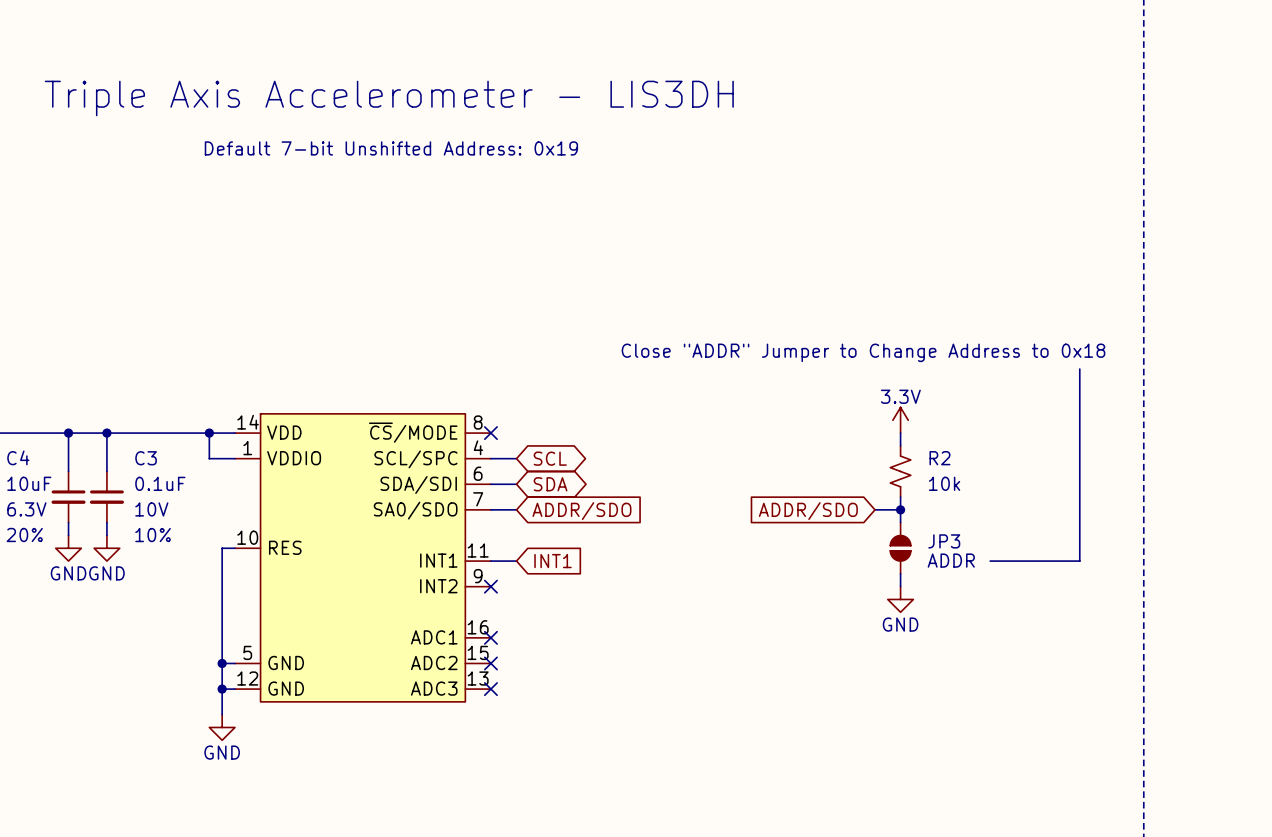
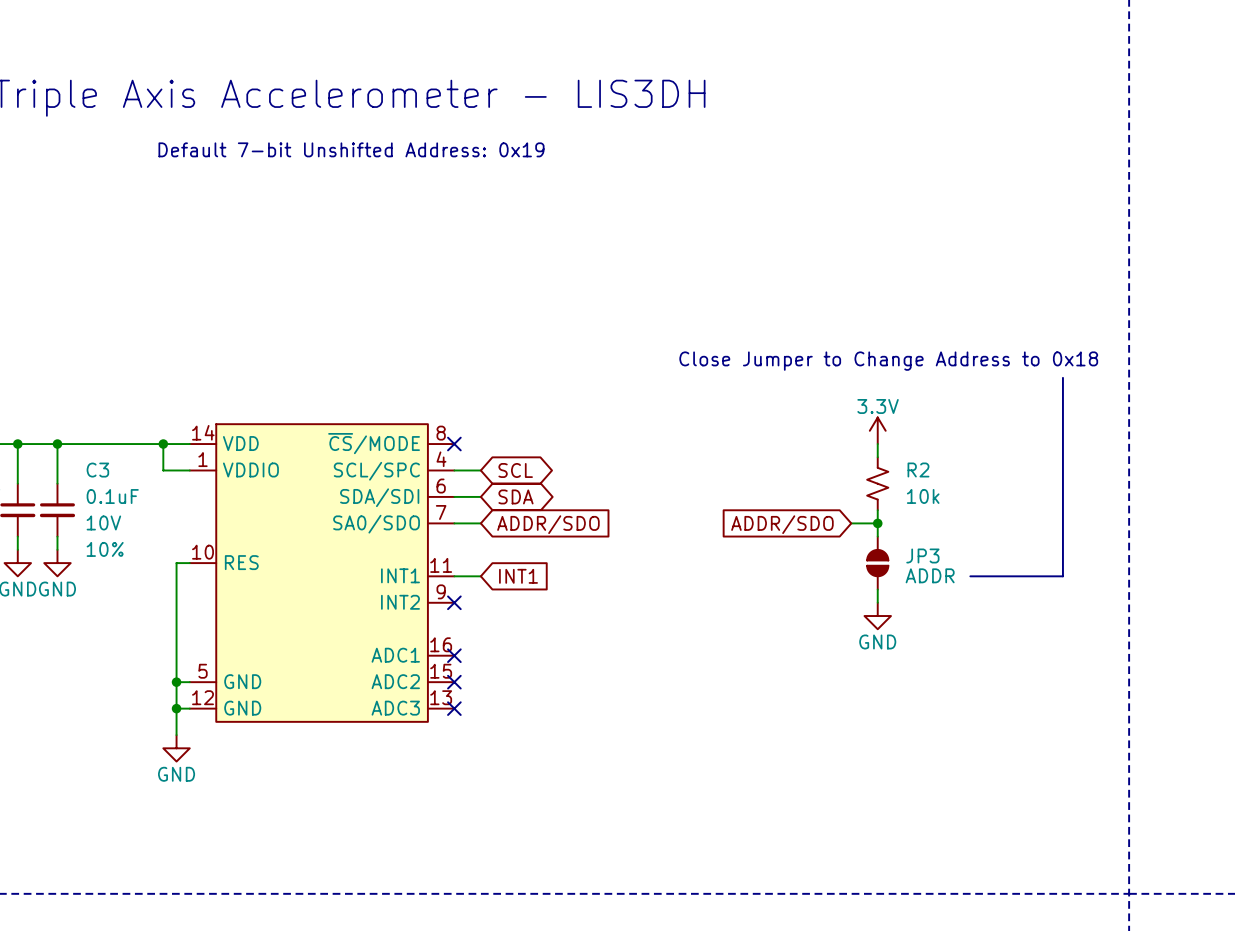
text: Close "ADDR" Jumper to Change Address to 0x18 (863, 352) -> Close Jumper to Change Address to 0x18 (888, 361)

